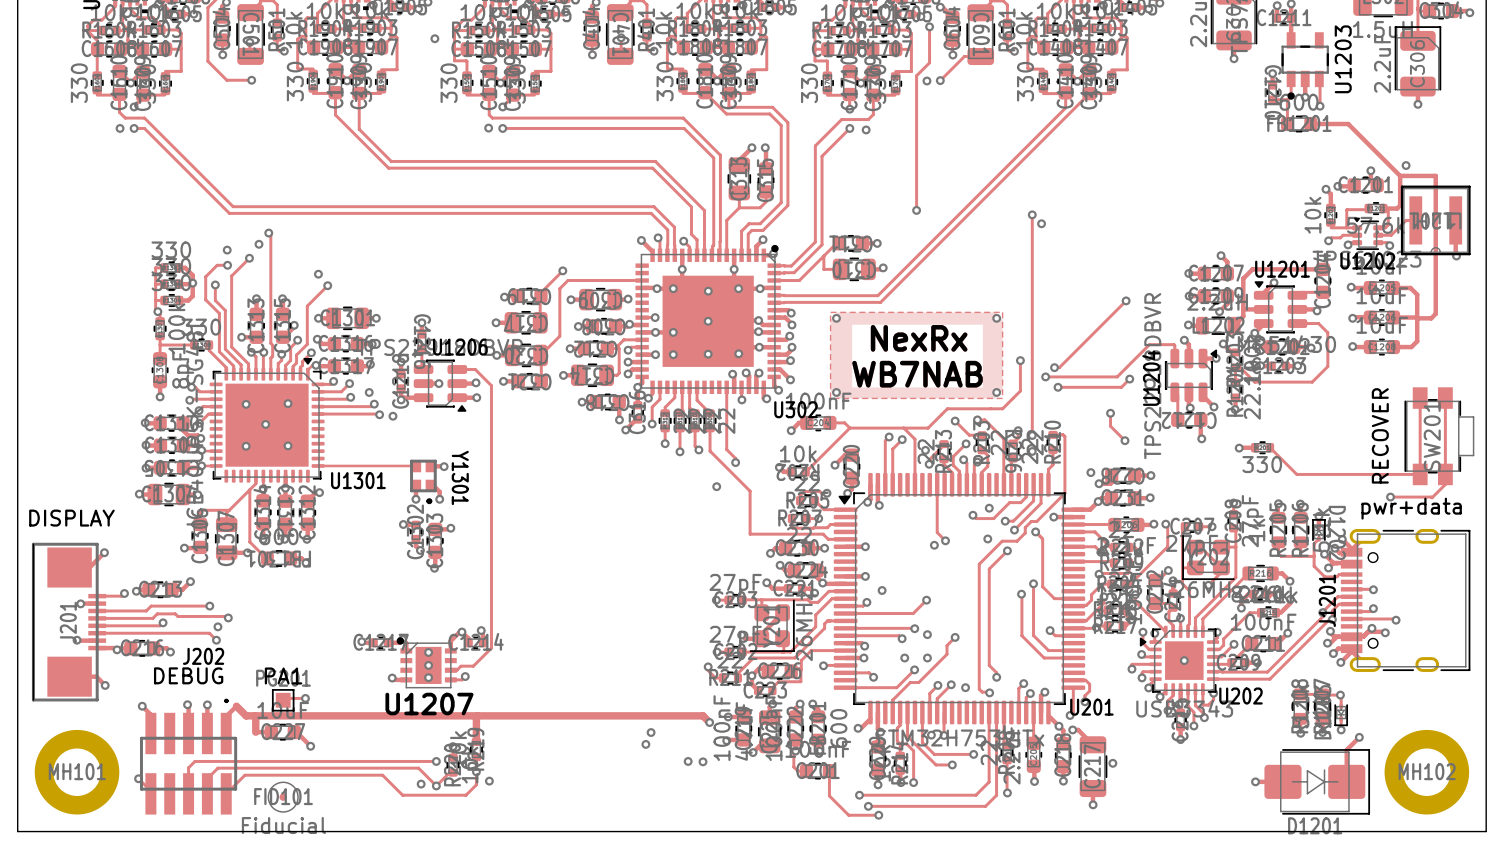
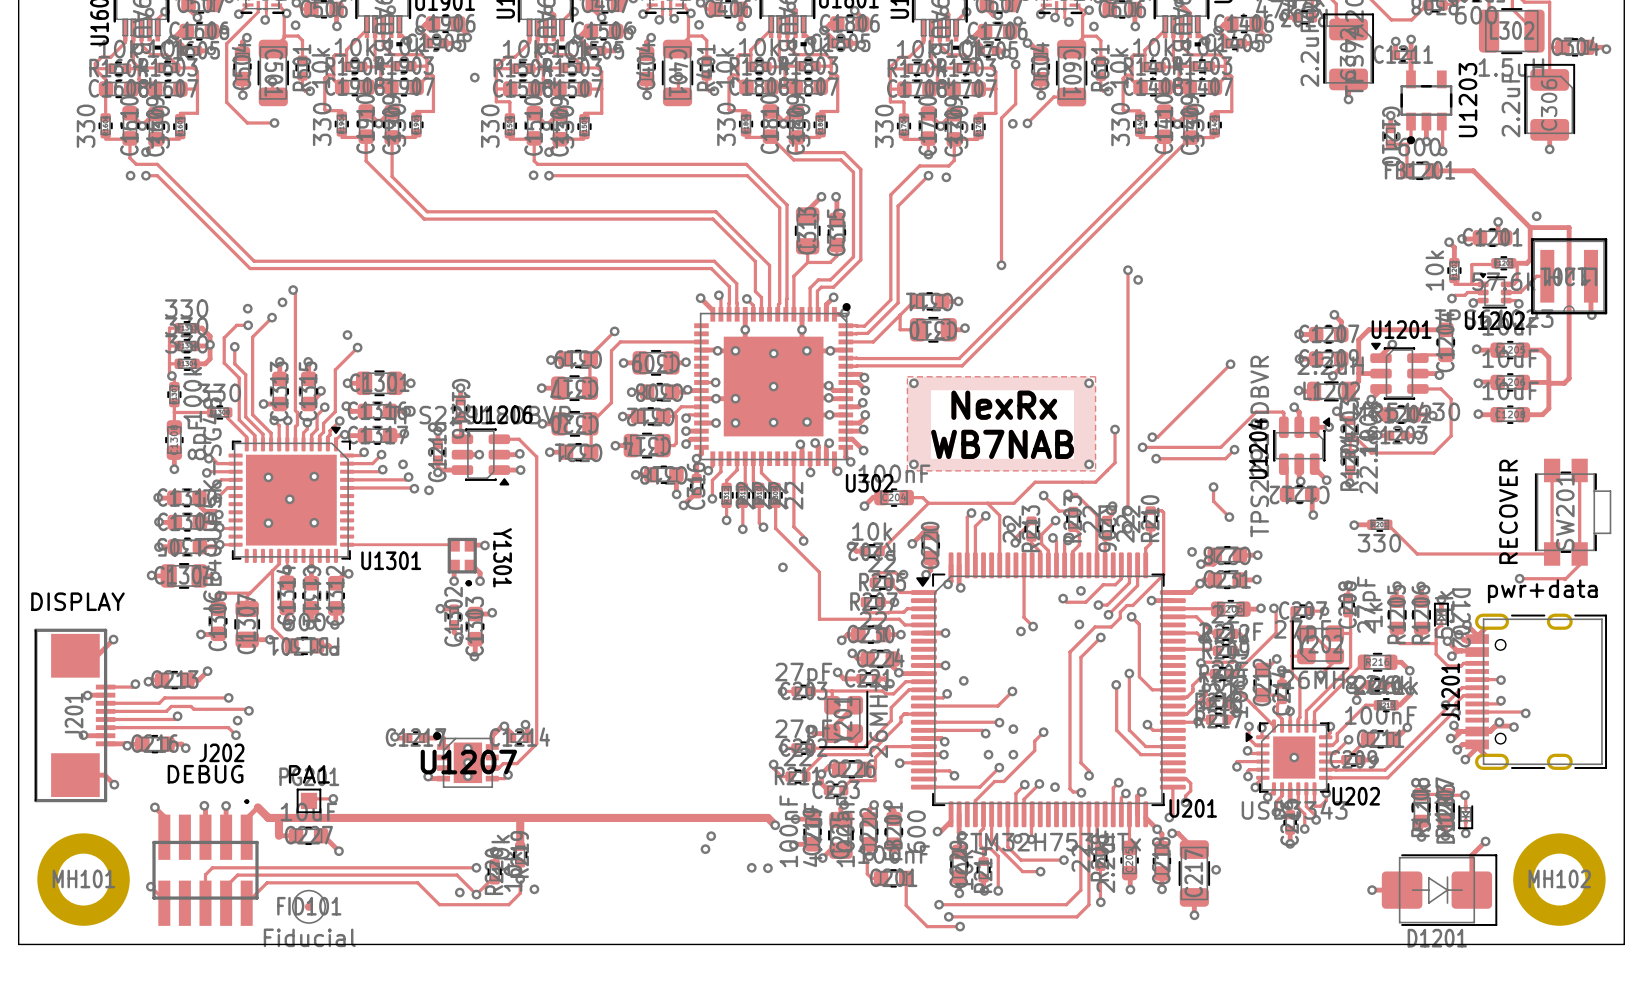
U1207 name position: U1207 (429, 704) -> U1207 (468, 762)

